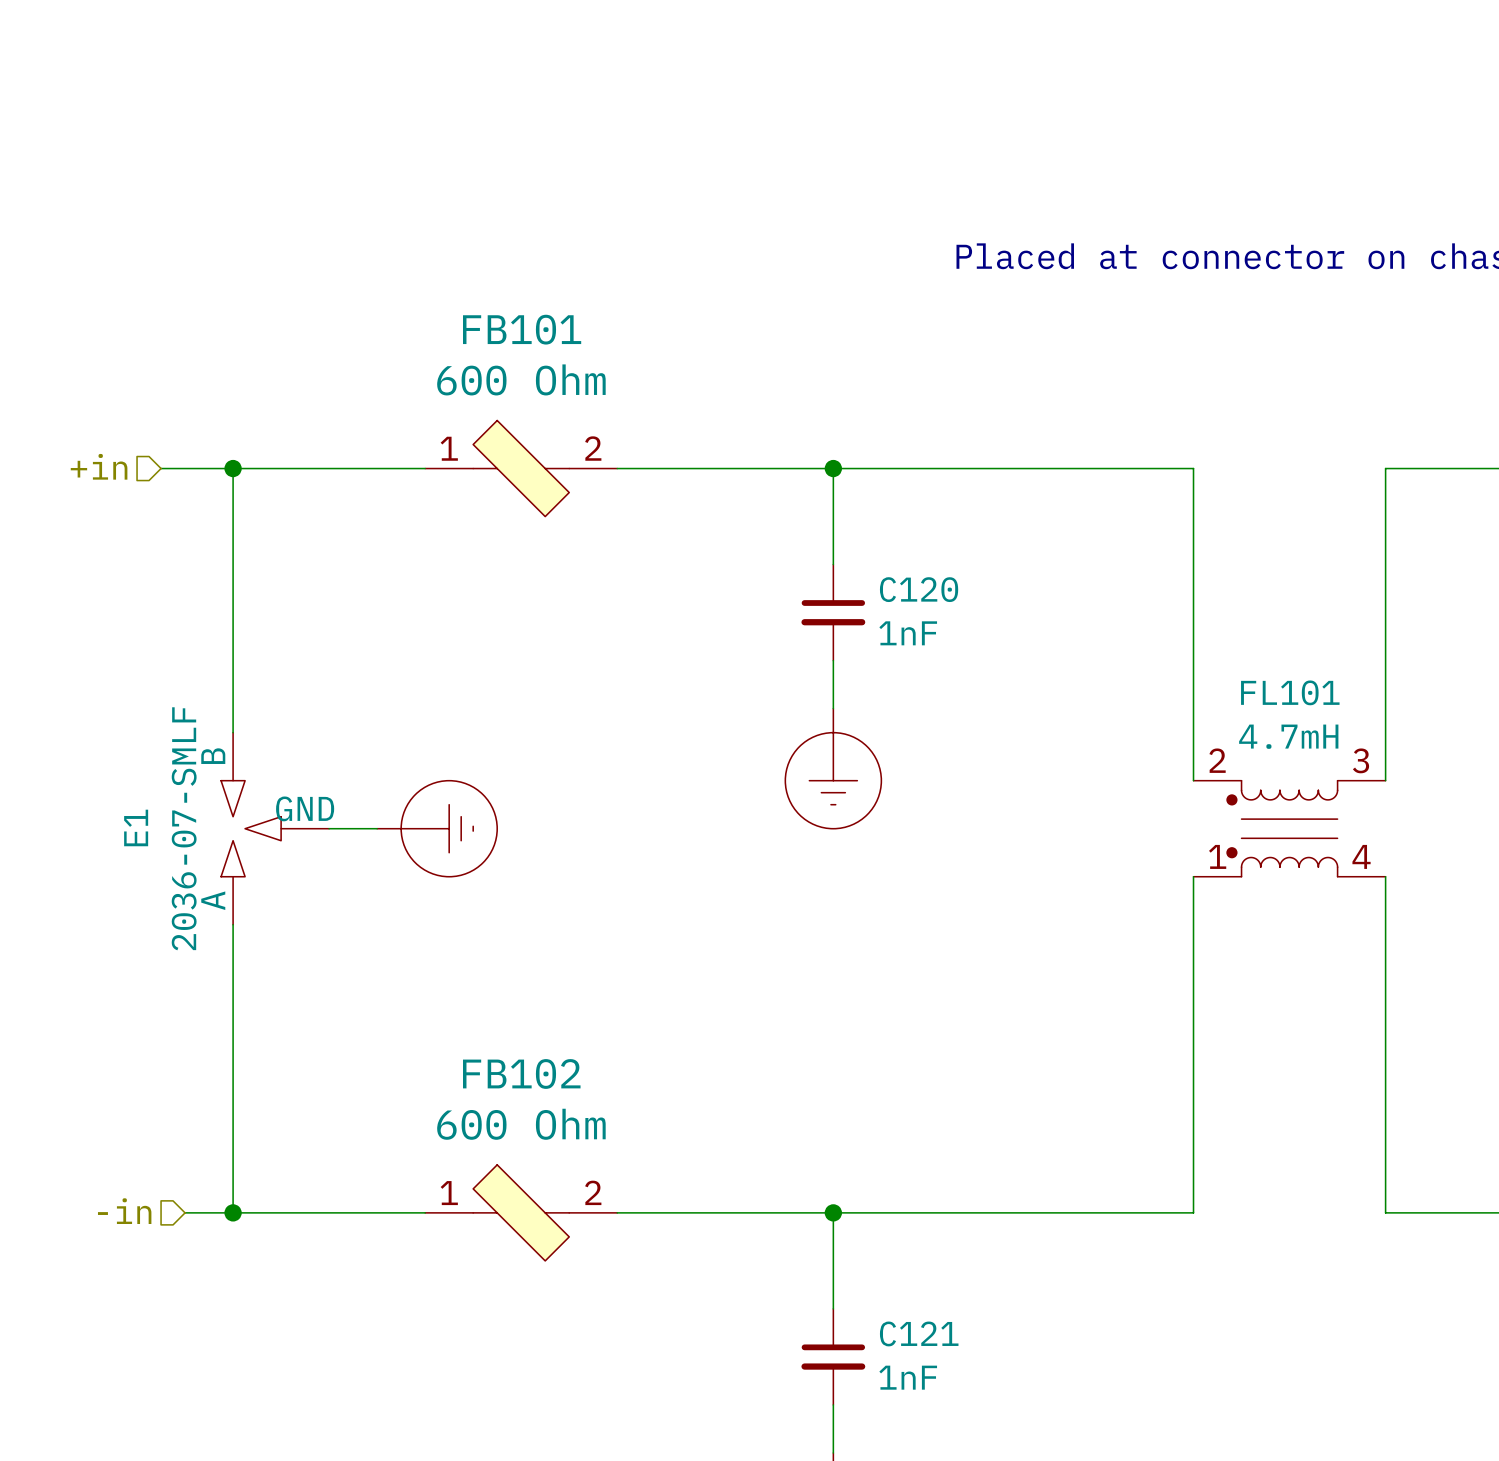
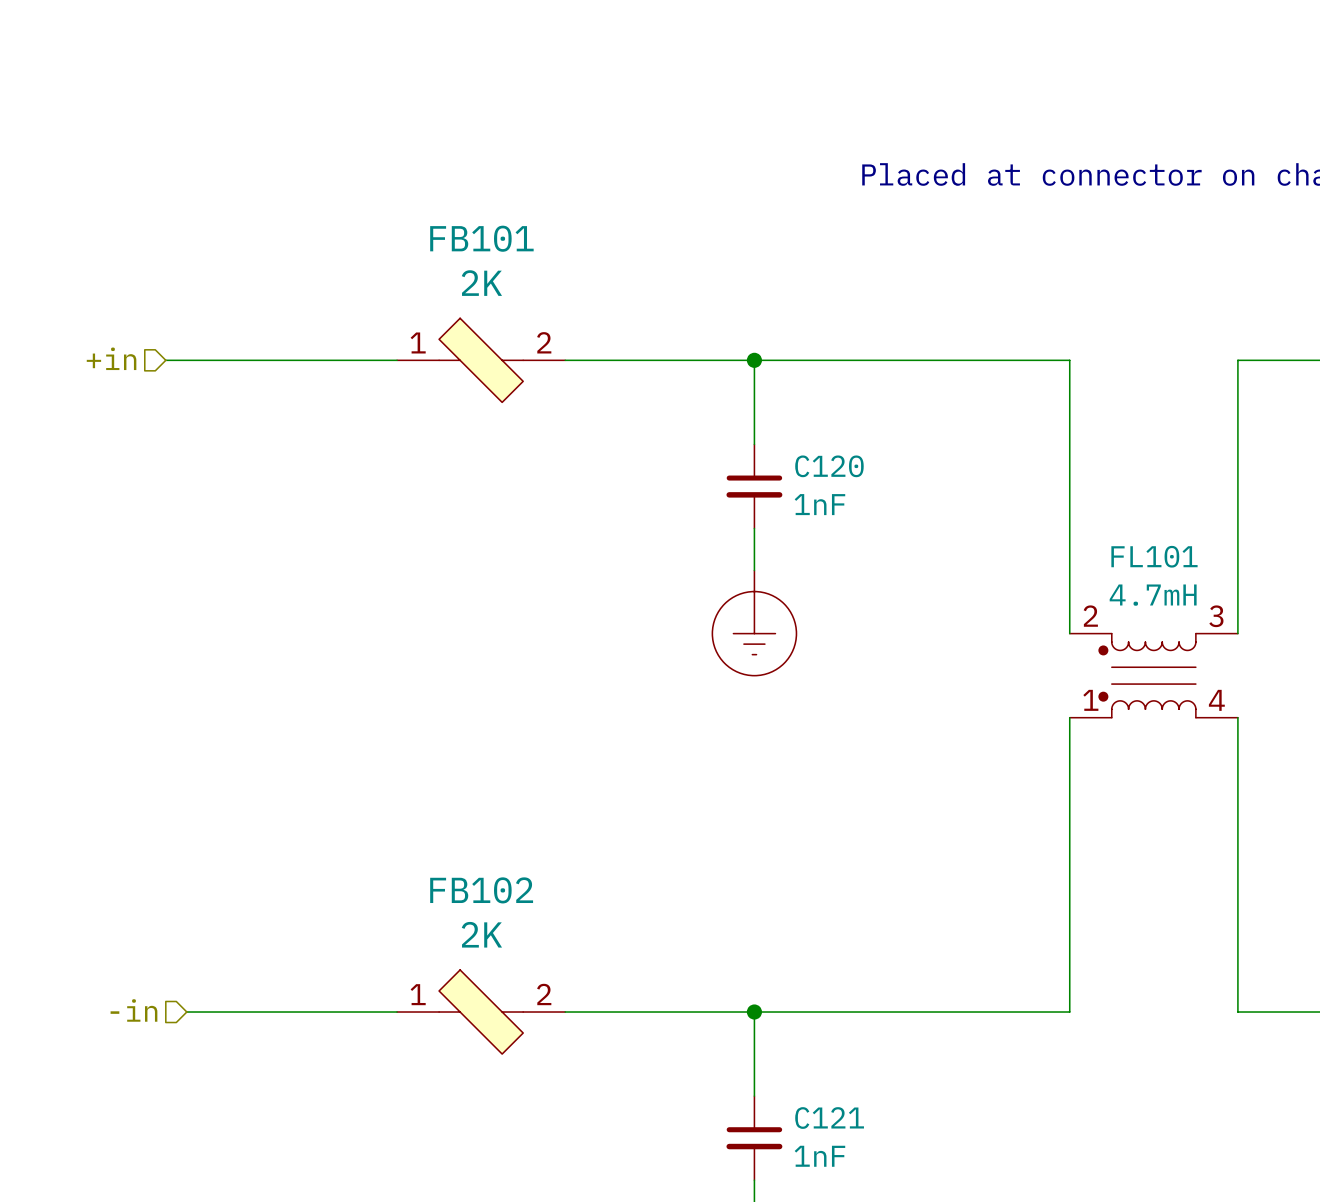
FB101 value: 600 Ohm (521, 379) -> 2K (481, 283)
wire: (233, 468) (233, 732) -> none
junction: (233, 468) -> none
E1: 2036-07-SMLF (275, 828) -> none
wire: (329, 828) (377, 828) -> none
power symbol: (437, 828) -> none
wire: (233, 924) (233, 1212) -> none
FB102 value: 600 Ohm (521, 1124) -> 2K (481, 934)
junction: (233, 1212) -> none

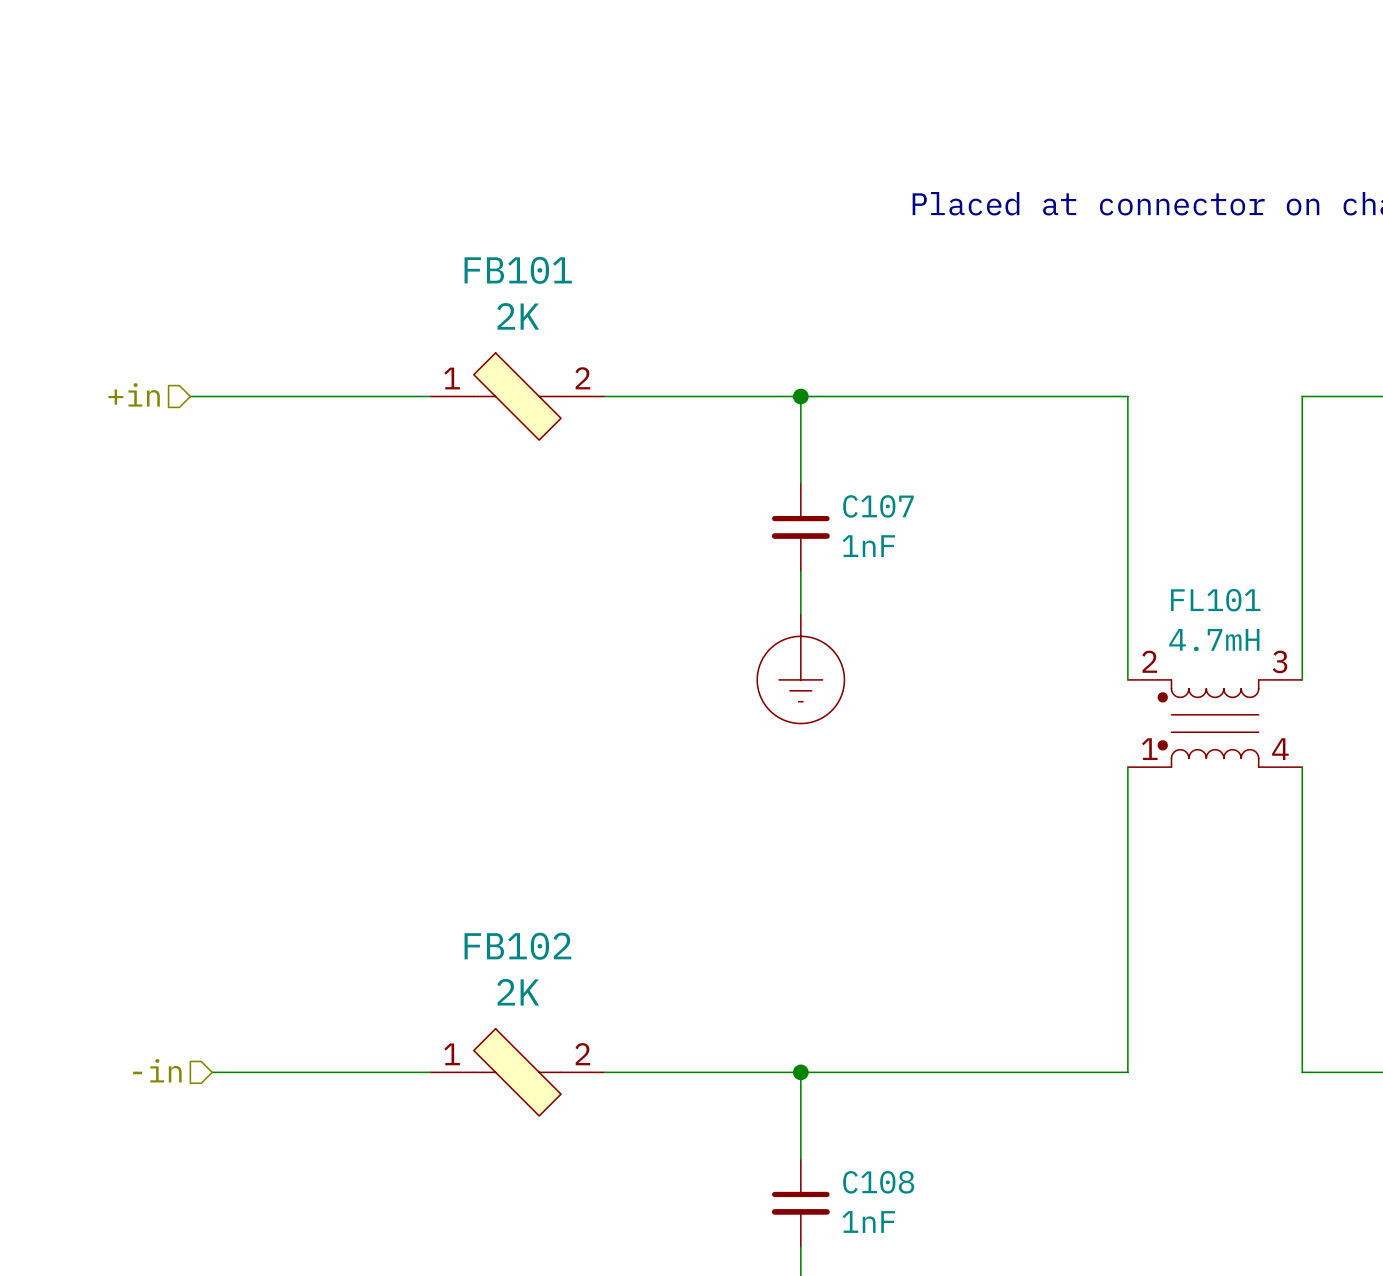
C120 name: C120 (829, 466) -> C107 (878, 506)
C121 name: C121 (829, 1118) -> C108 (878, 1182)

